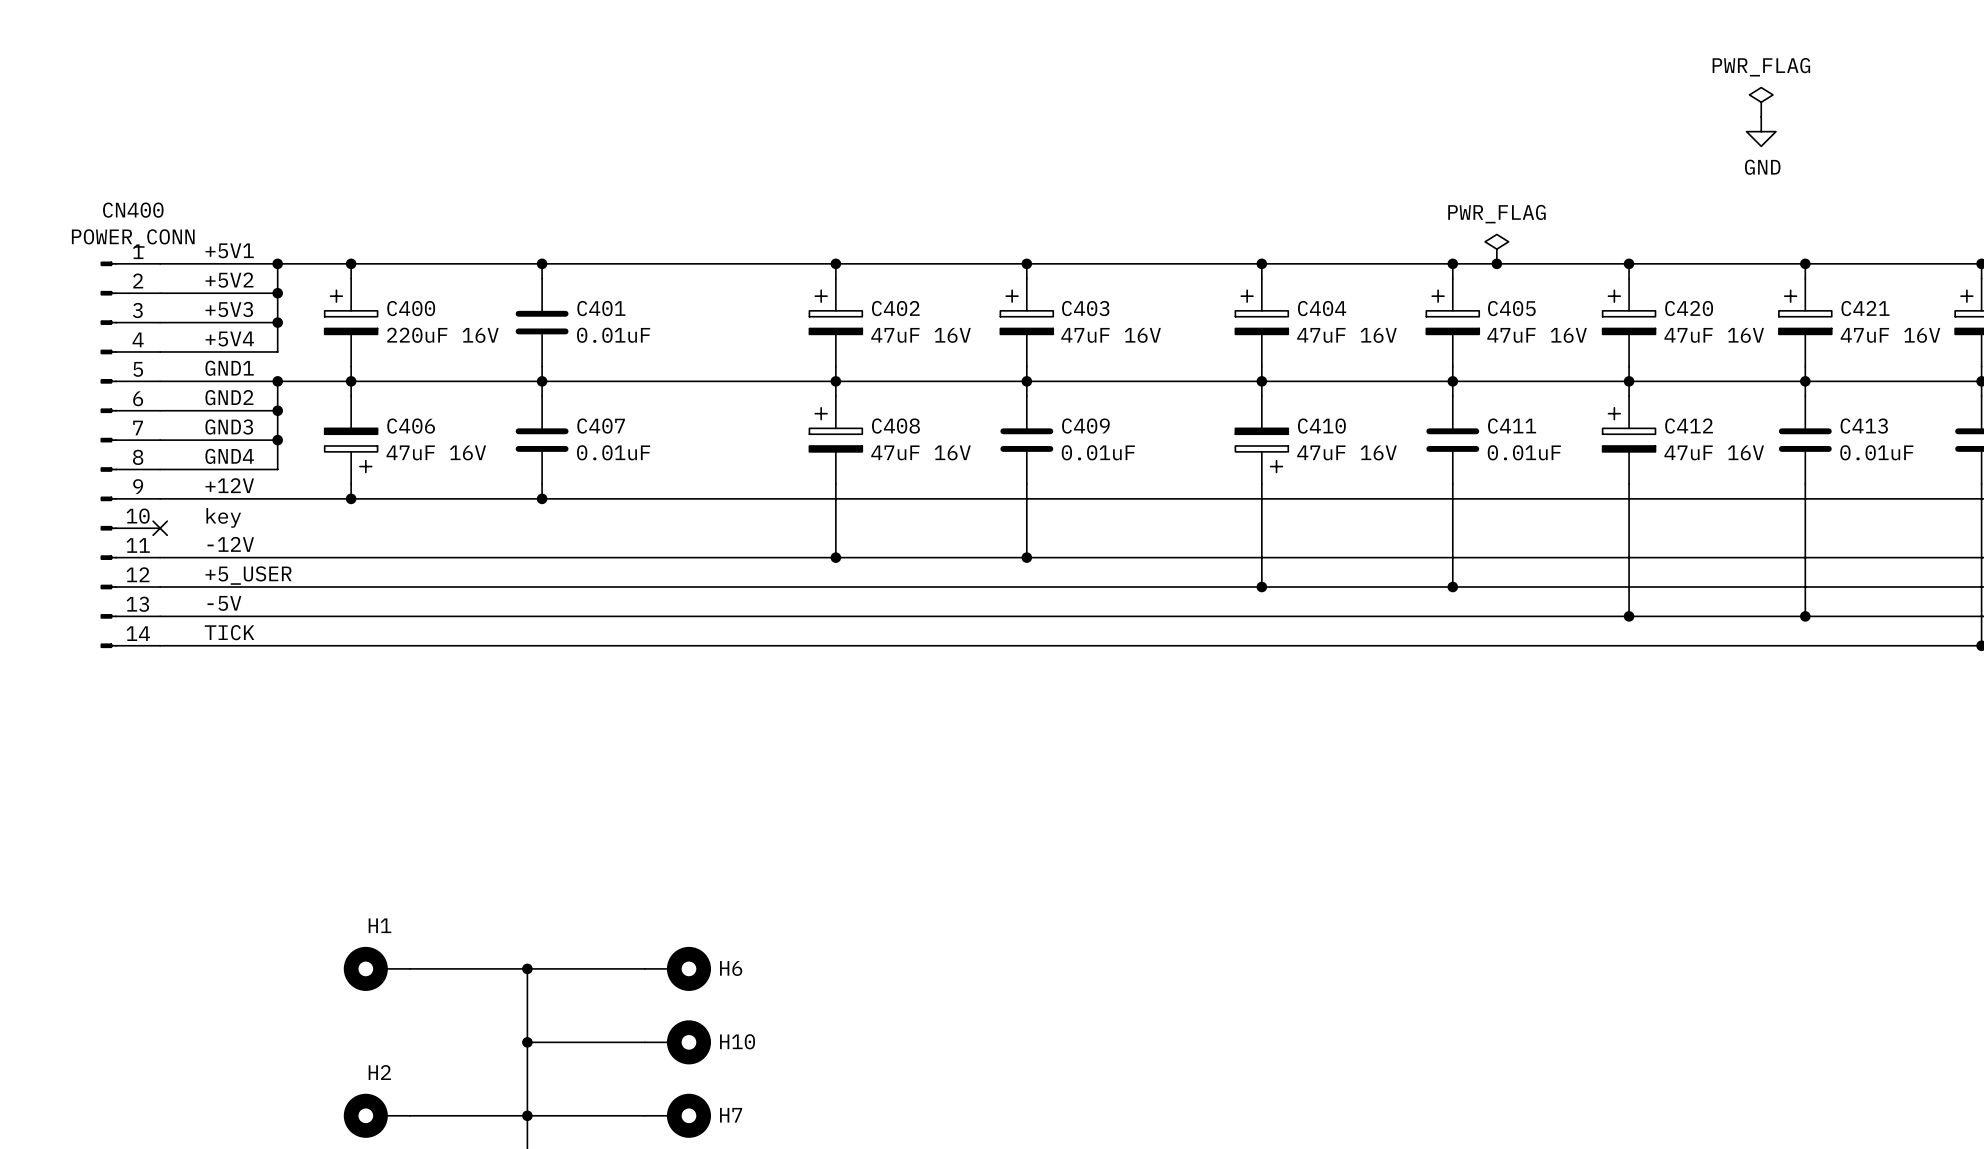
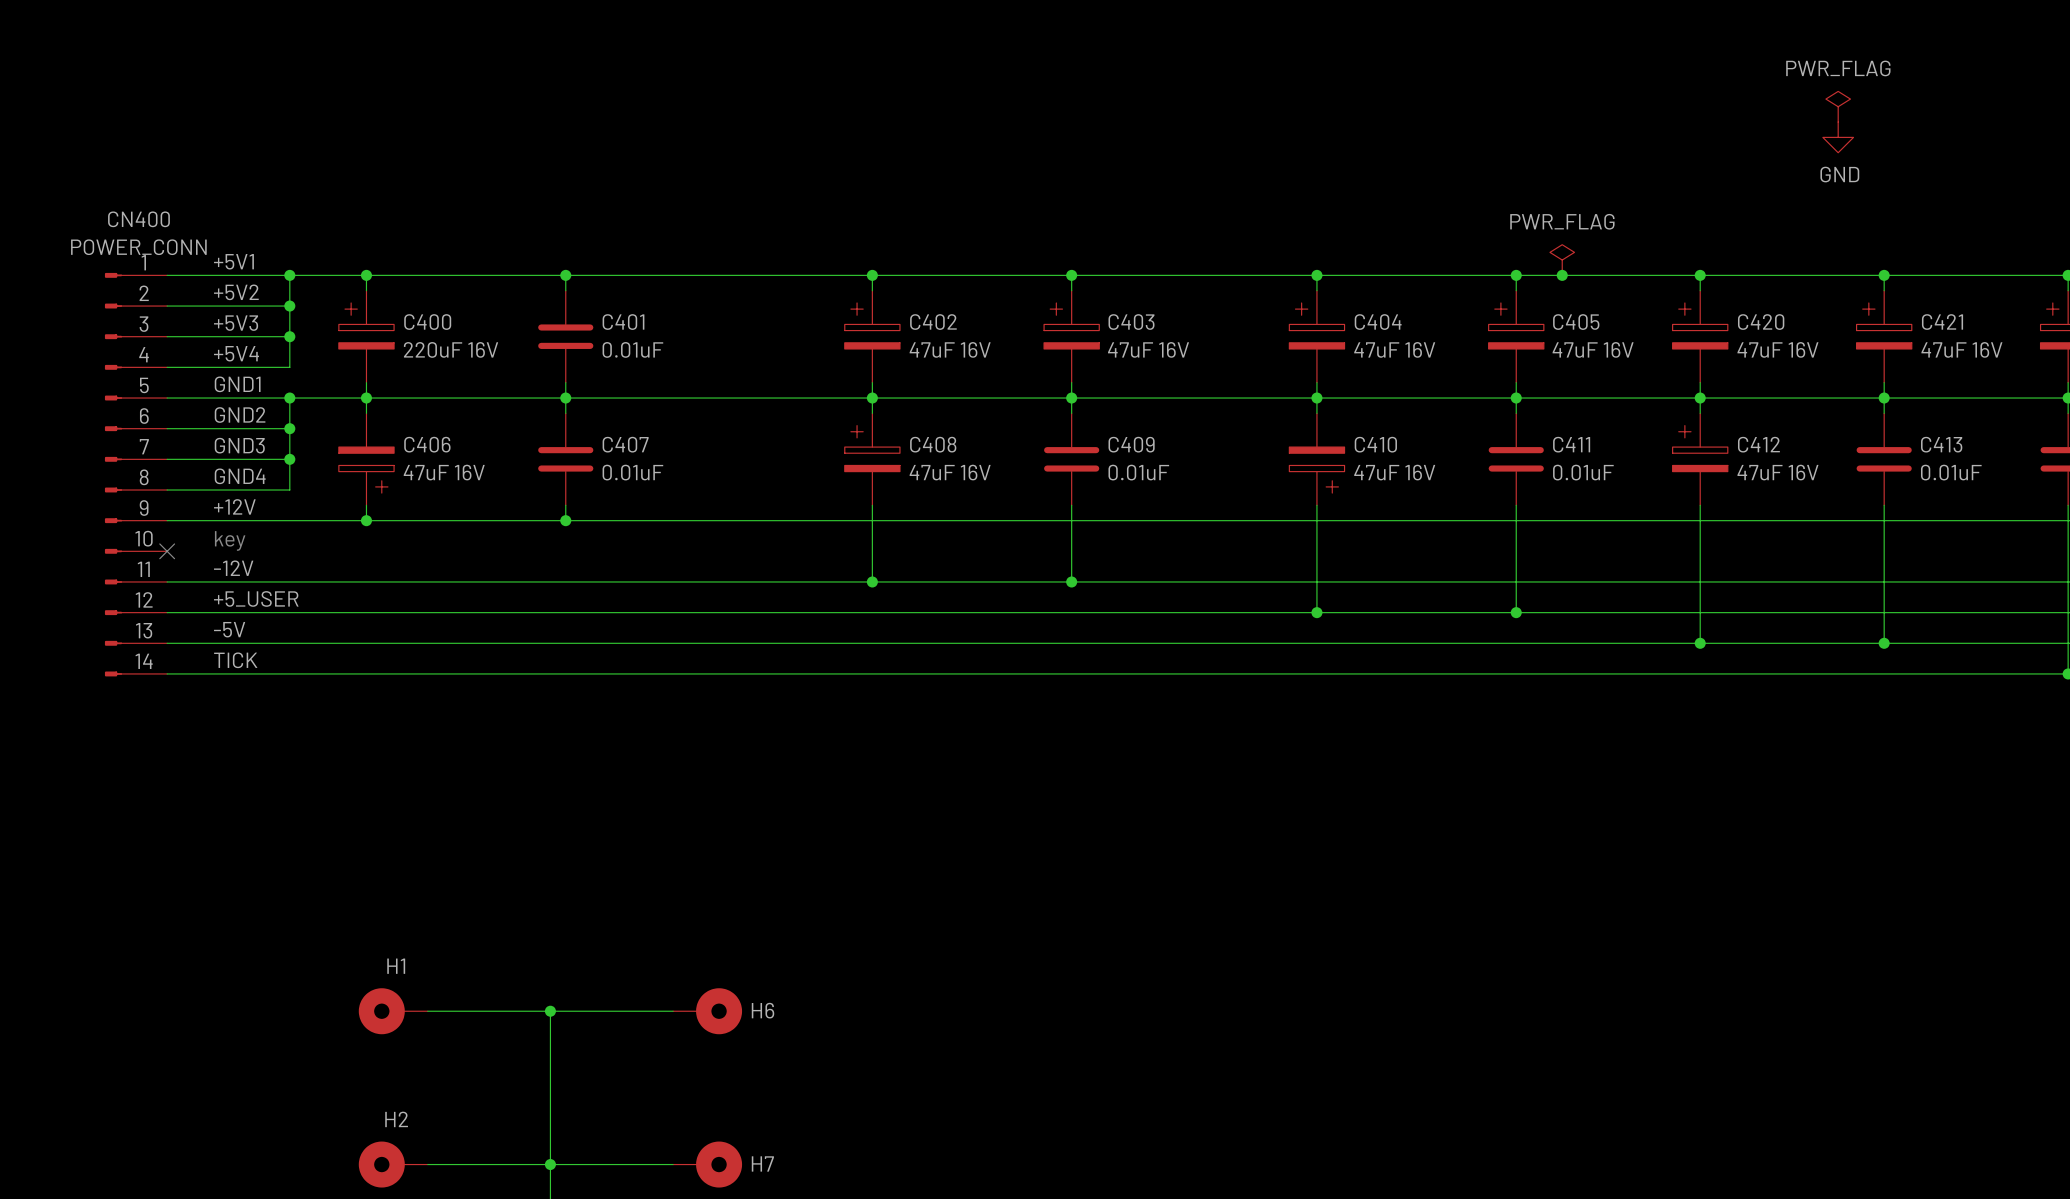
wire: (527, 1042) (644, 1042) -> none
junction: (527, 1042) -> none
H10: (677, 1042) -> none

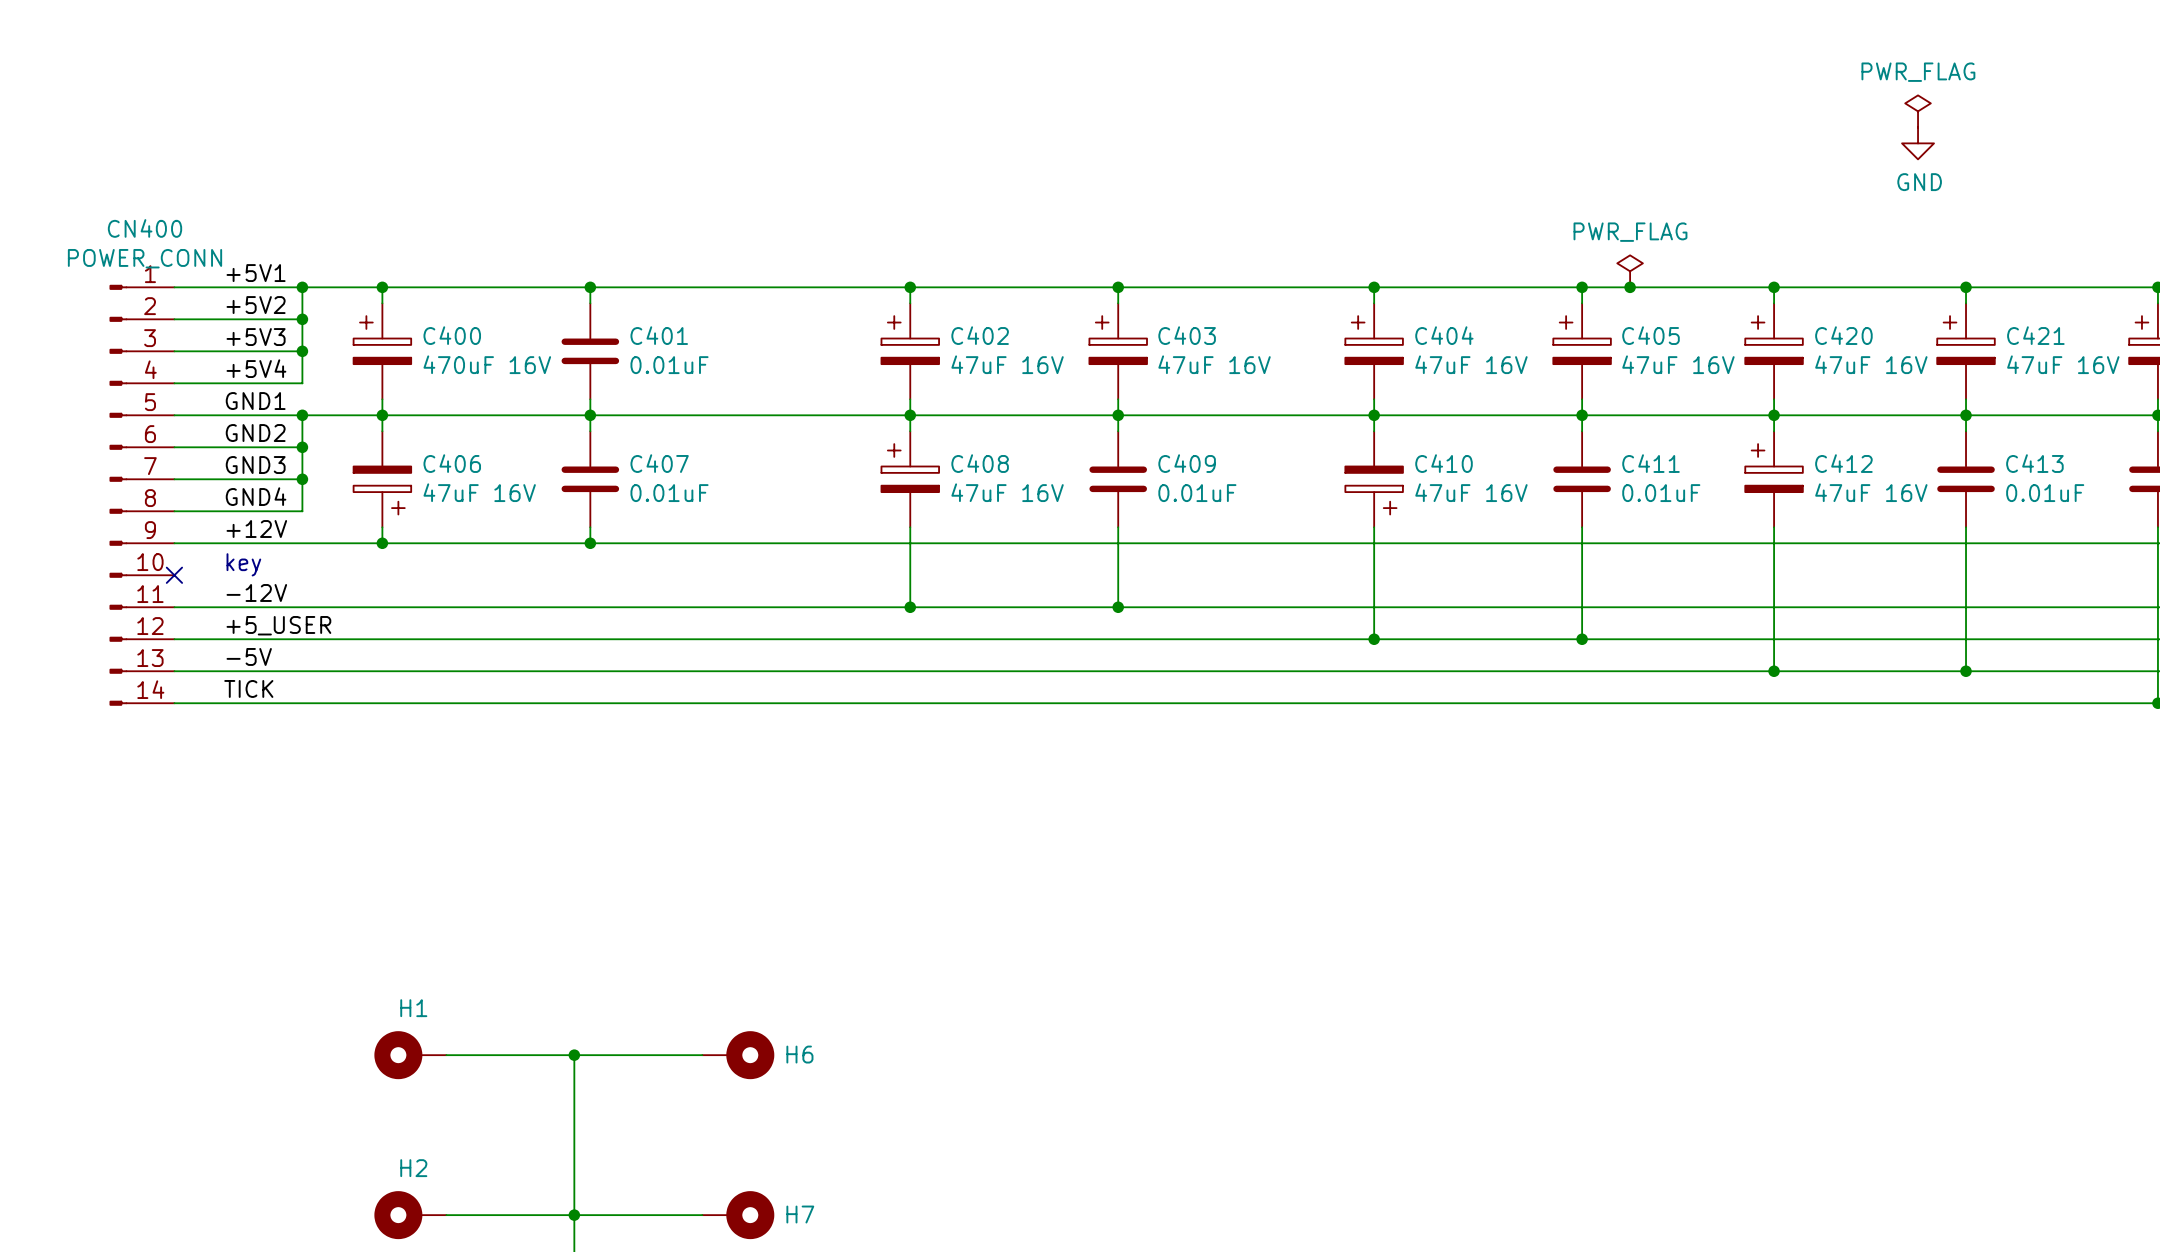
C400 value: 220uF 16V (451, 349) -> 470uF 16V (487, 364)

